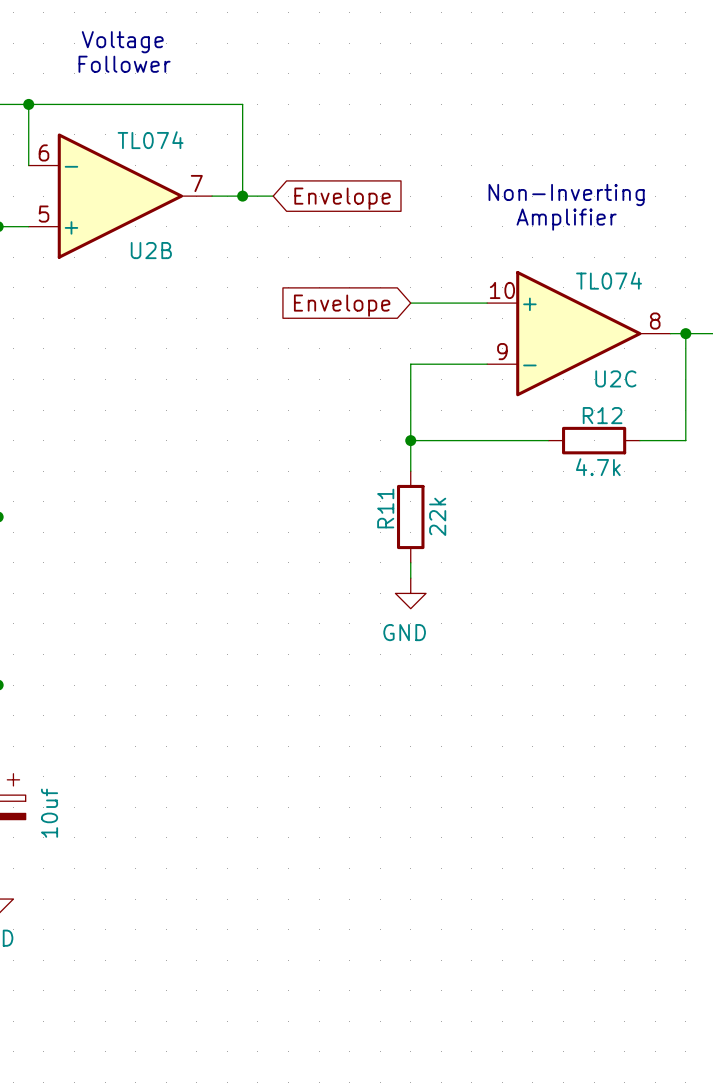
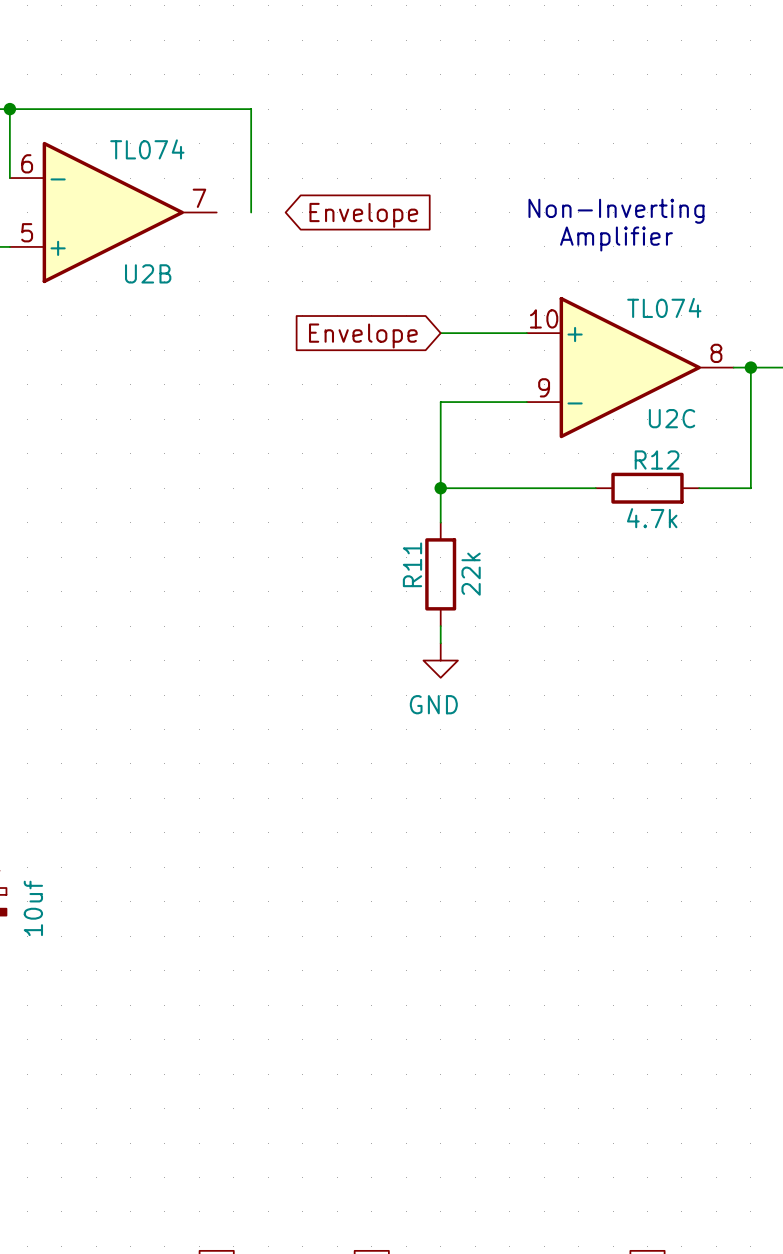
text: Voltage (122, 42) -> none
text: Follower (124, 64) -> none
wire: (212, 196) (273, 196) -> none
junction: (242, 196) -> none

